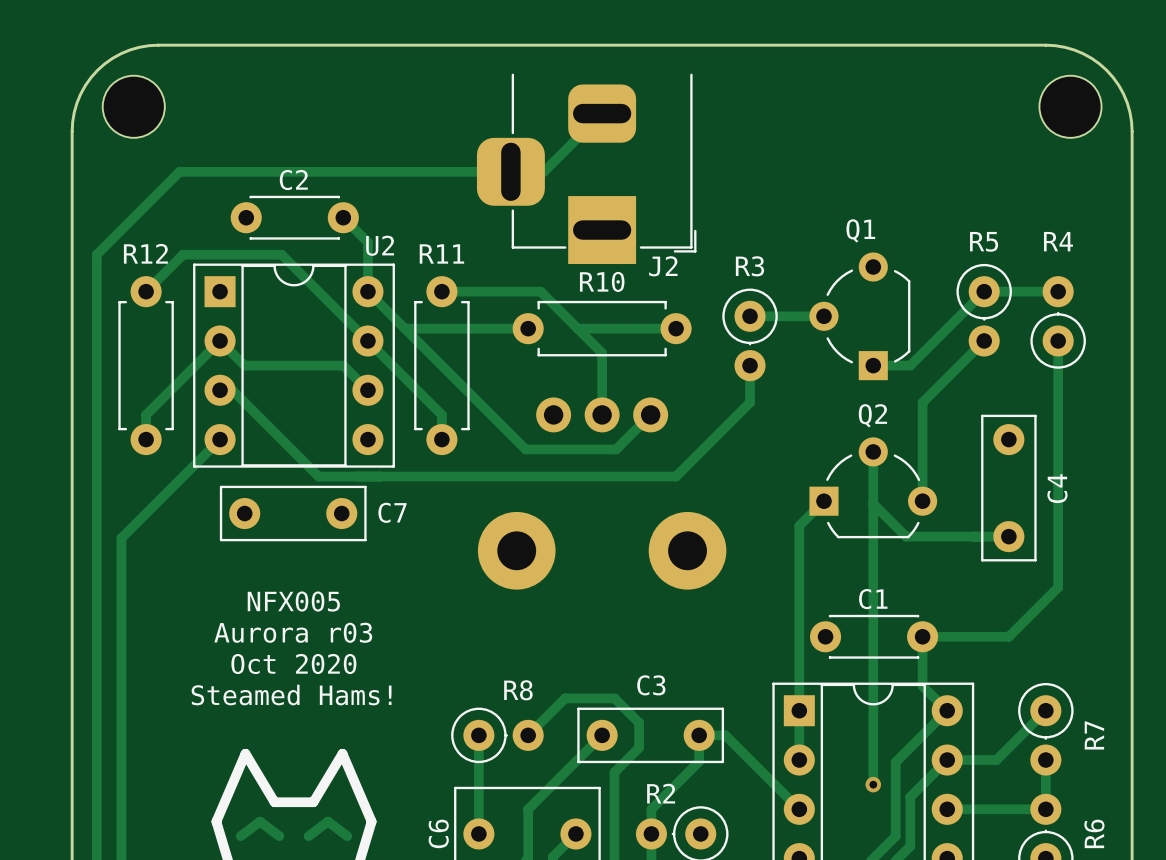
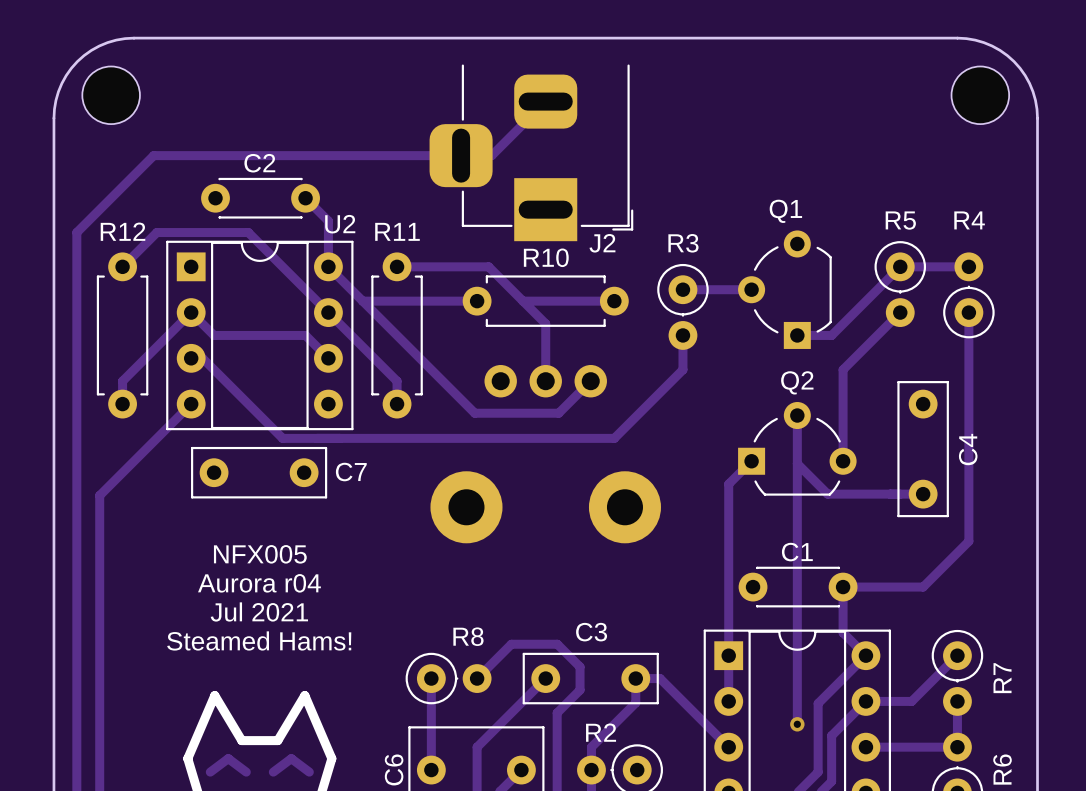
text: Aurora r03 (293, 632) -> Aurora r04 (259, 583)
text: Oct 2020 (293, 664) -> Jul 2021 (259, 611)

